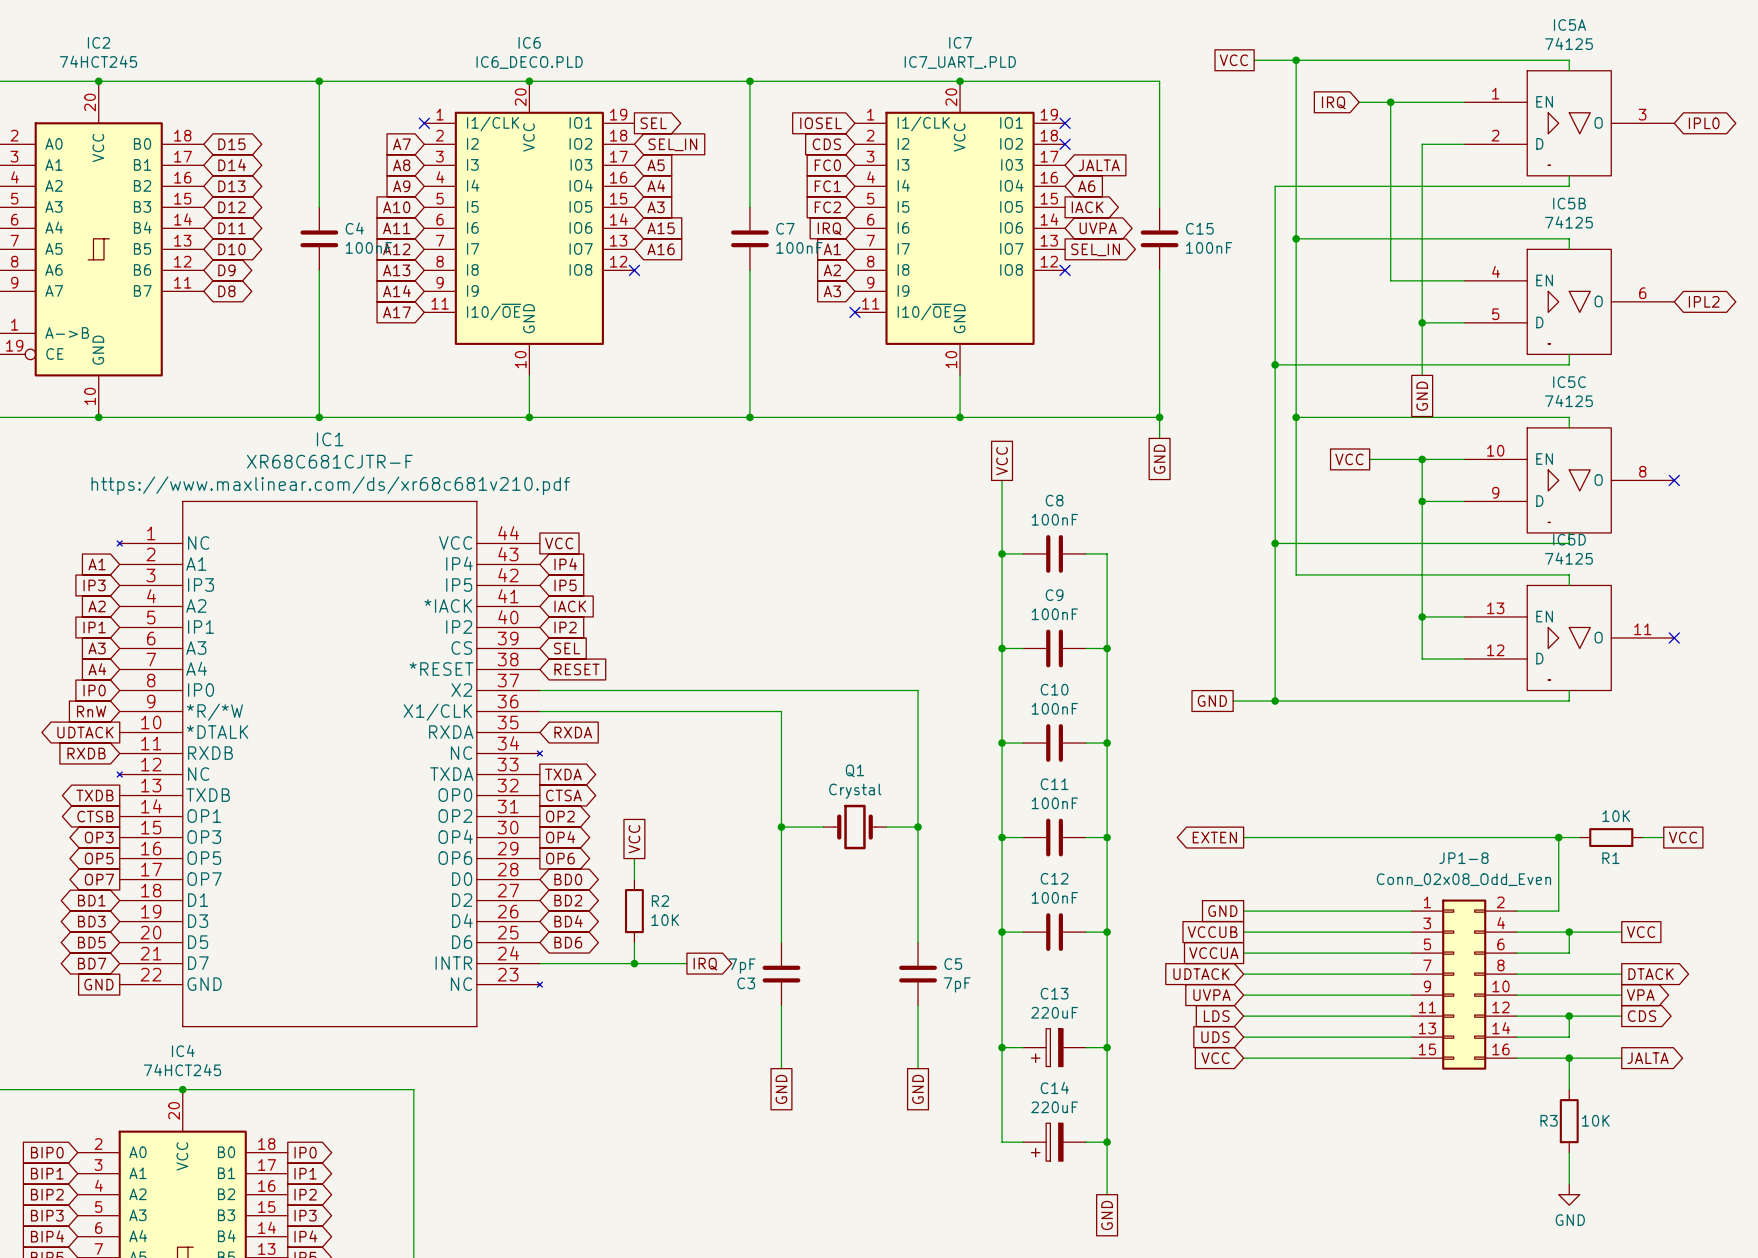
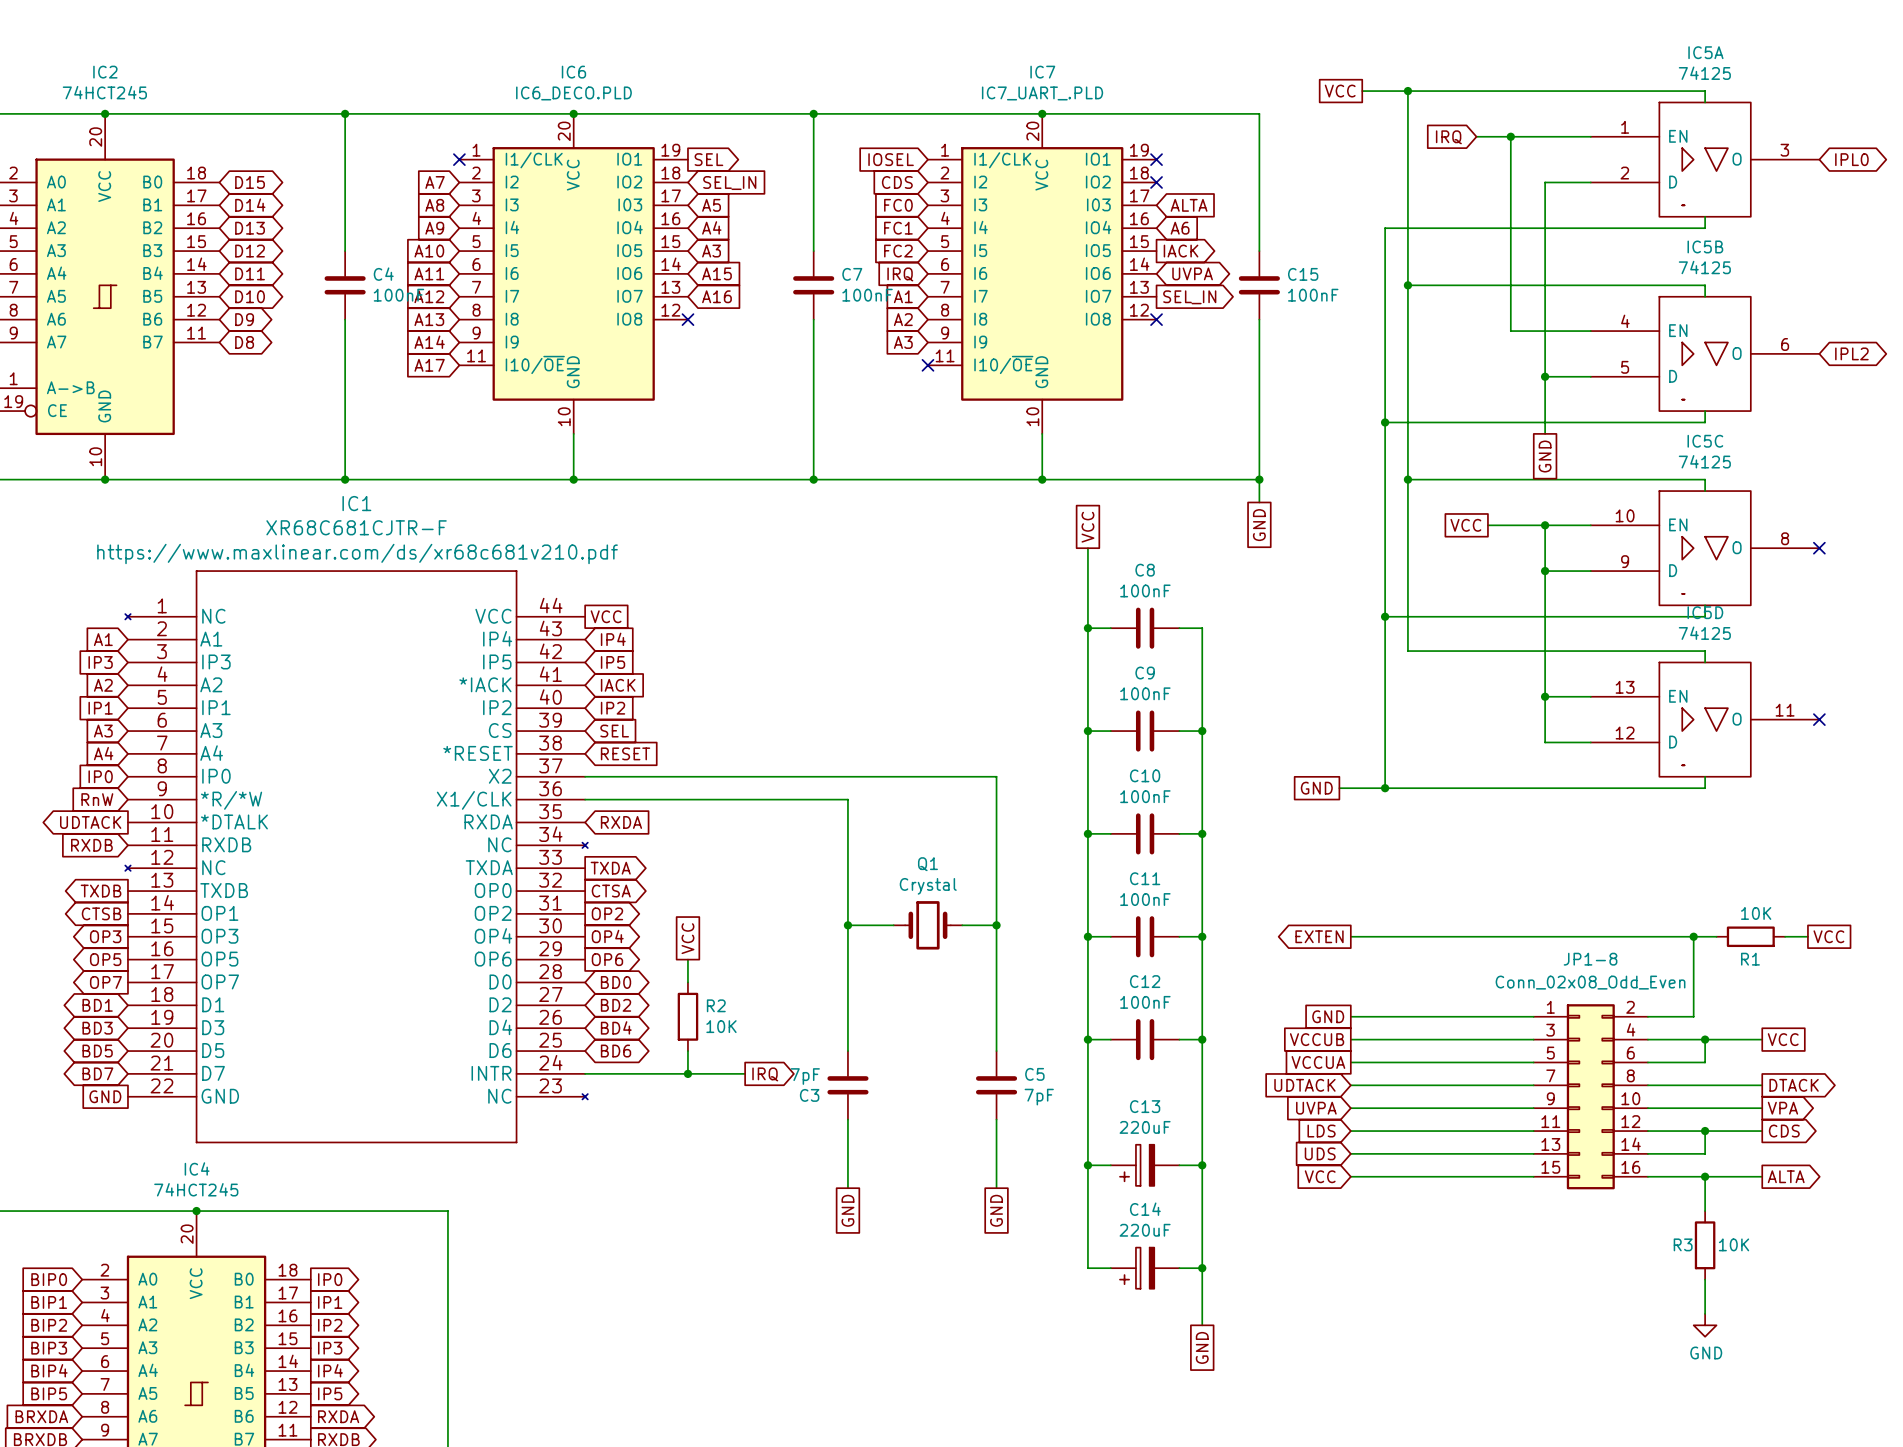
global label: JALTA (1099, 165) -> ALTA (1189, 205)
global label: JALTA (1648, 1058) -> ALTA (1786, 1176)

